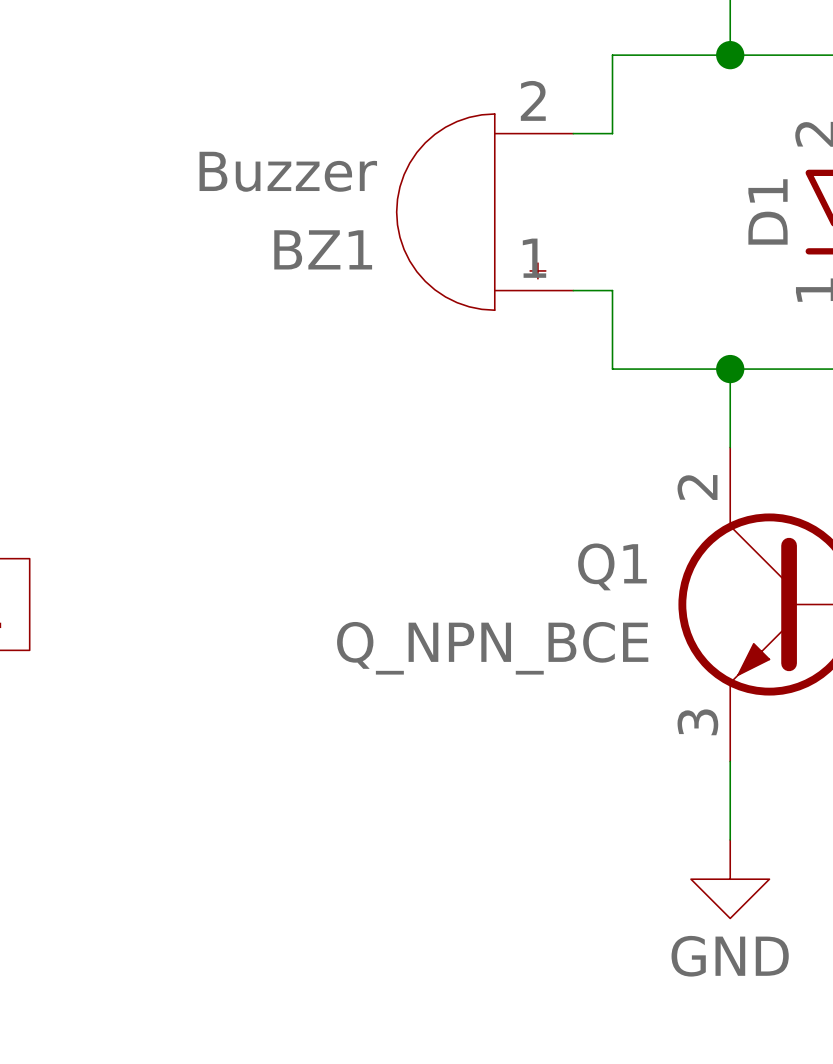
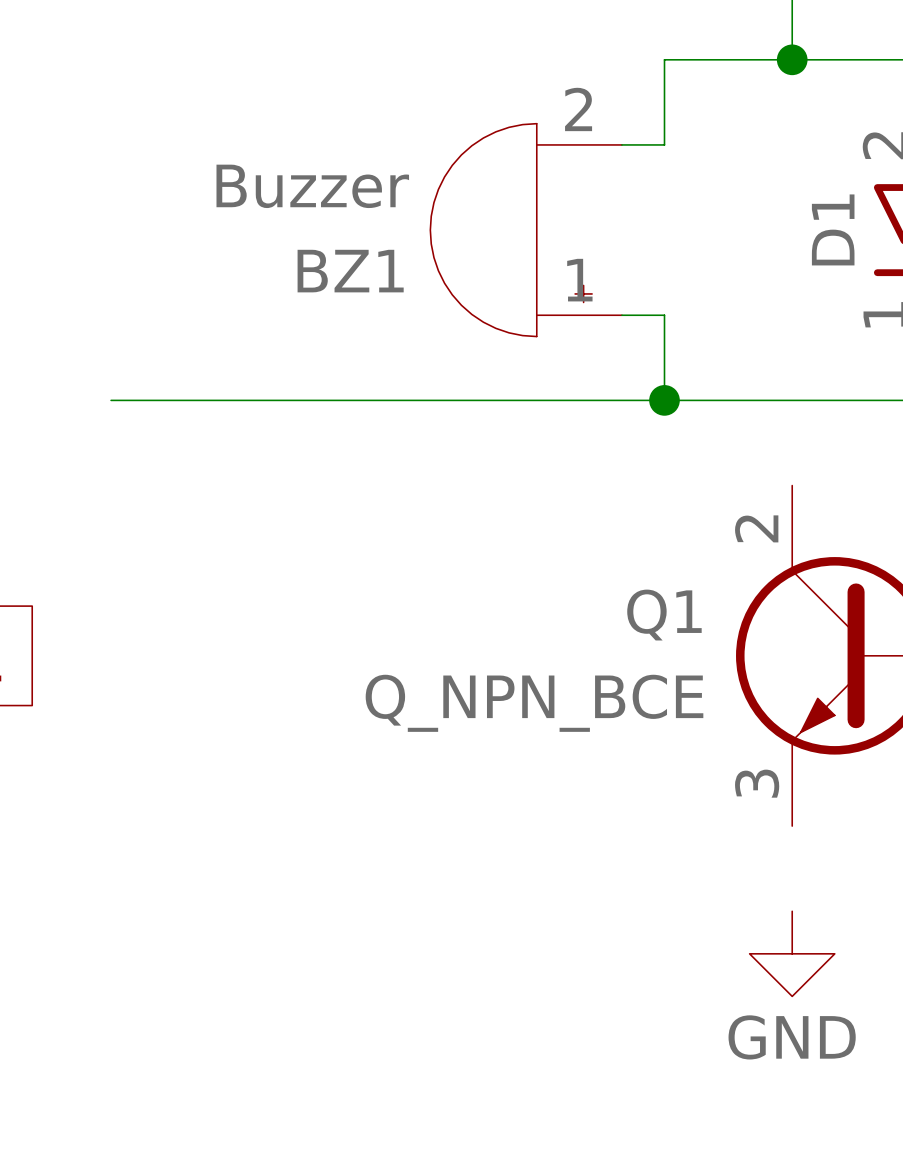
wire: none -> (111, 400) (664, 400)
junction: none -> (664, 400)
wire: (730, 369) (730, 447) -> none
junction: (730, 369) -> none
wire: (730, 761) (730, 839) -> none

